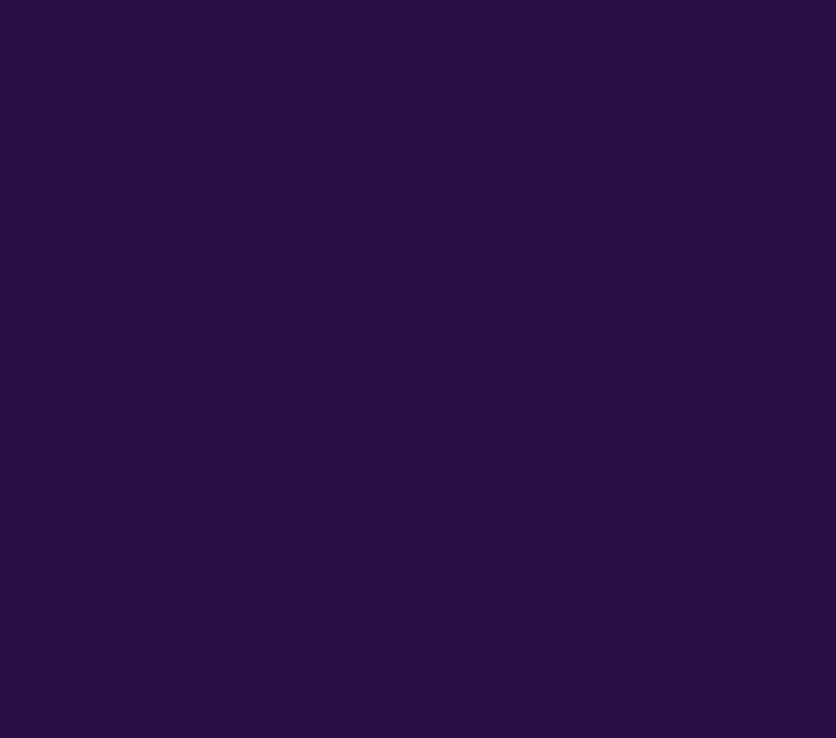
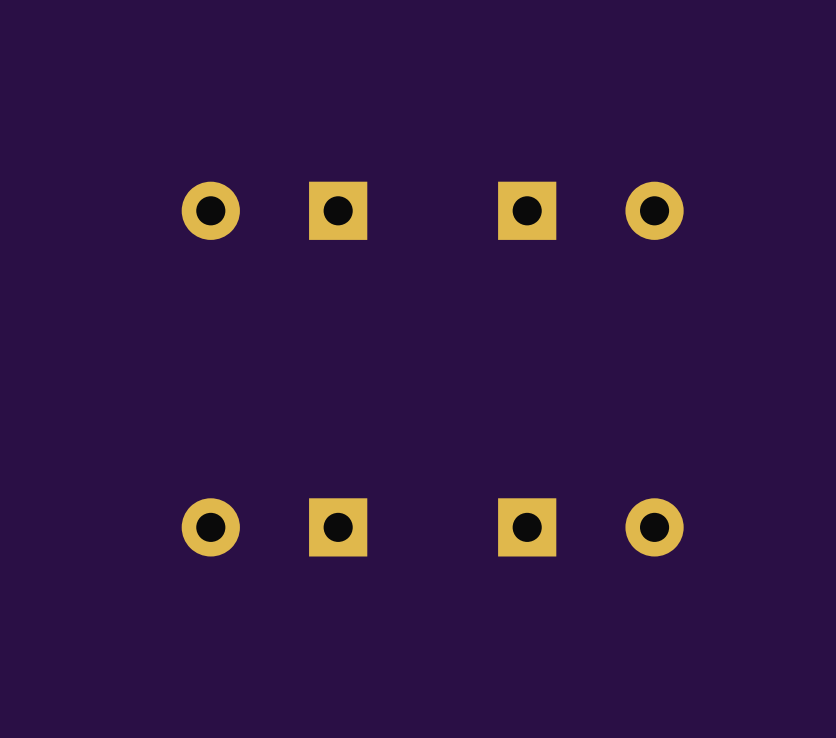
part: none -> (274, 210)
part: none -> (590, 210)
part: none -> (274, 527)
part: none -> (590, 527)

